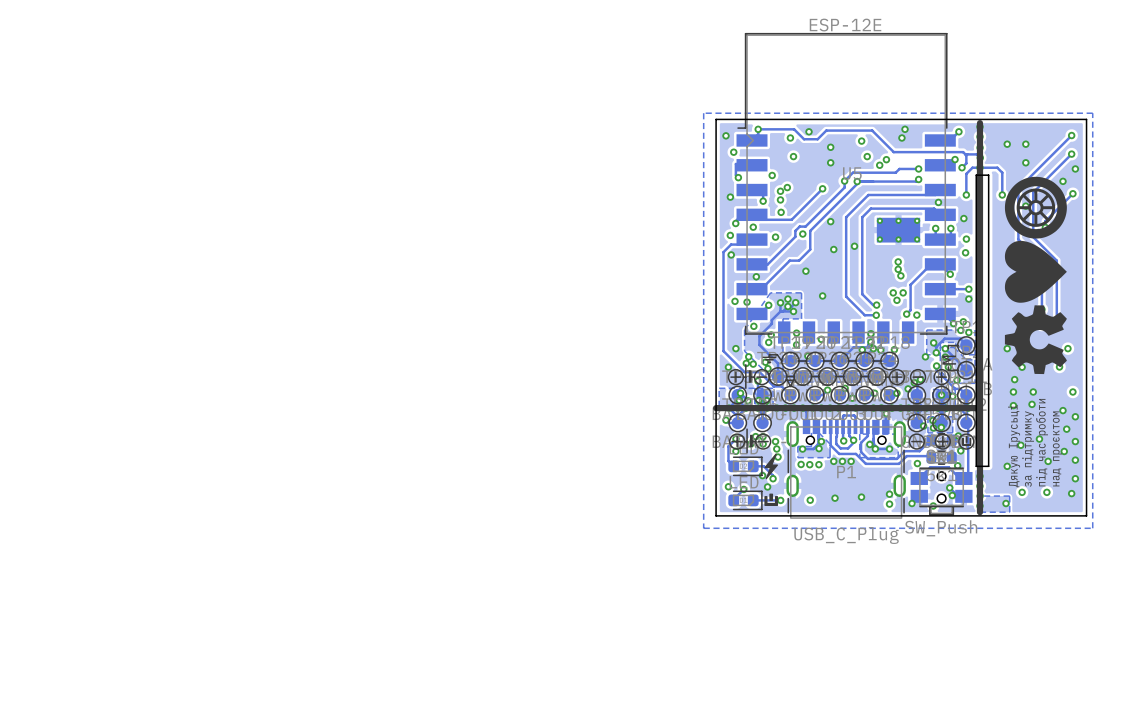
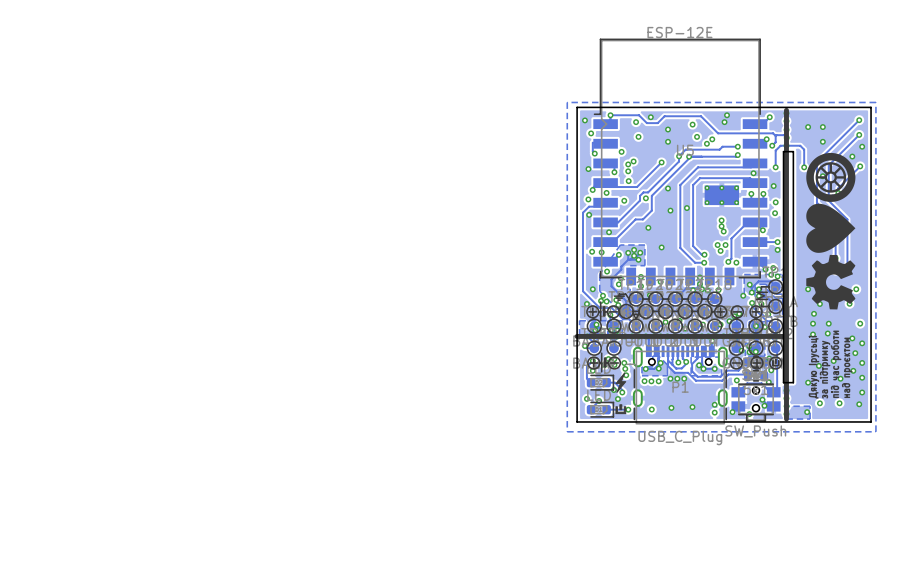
track: (855, 426) (854, 415) (843, 416) (843, 426) -> none

